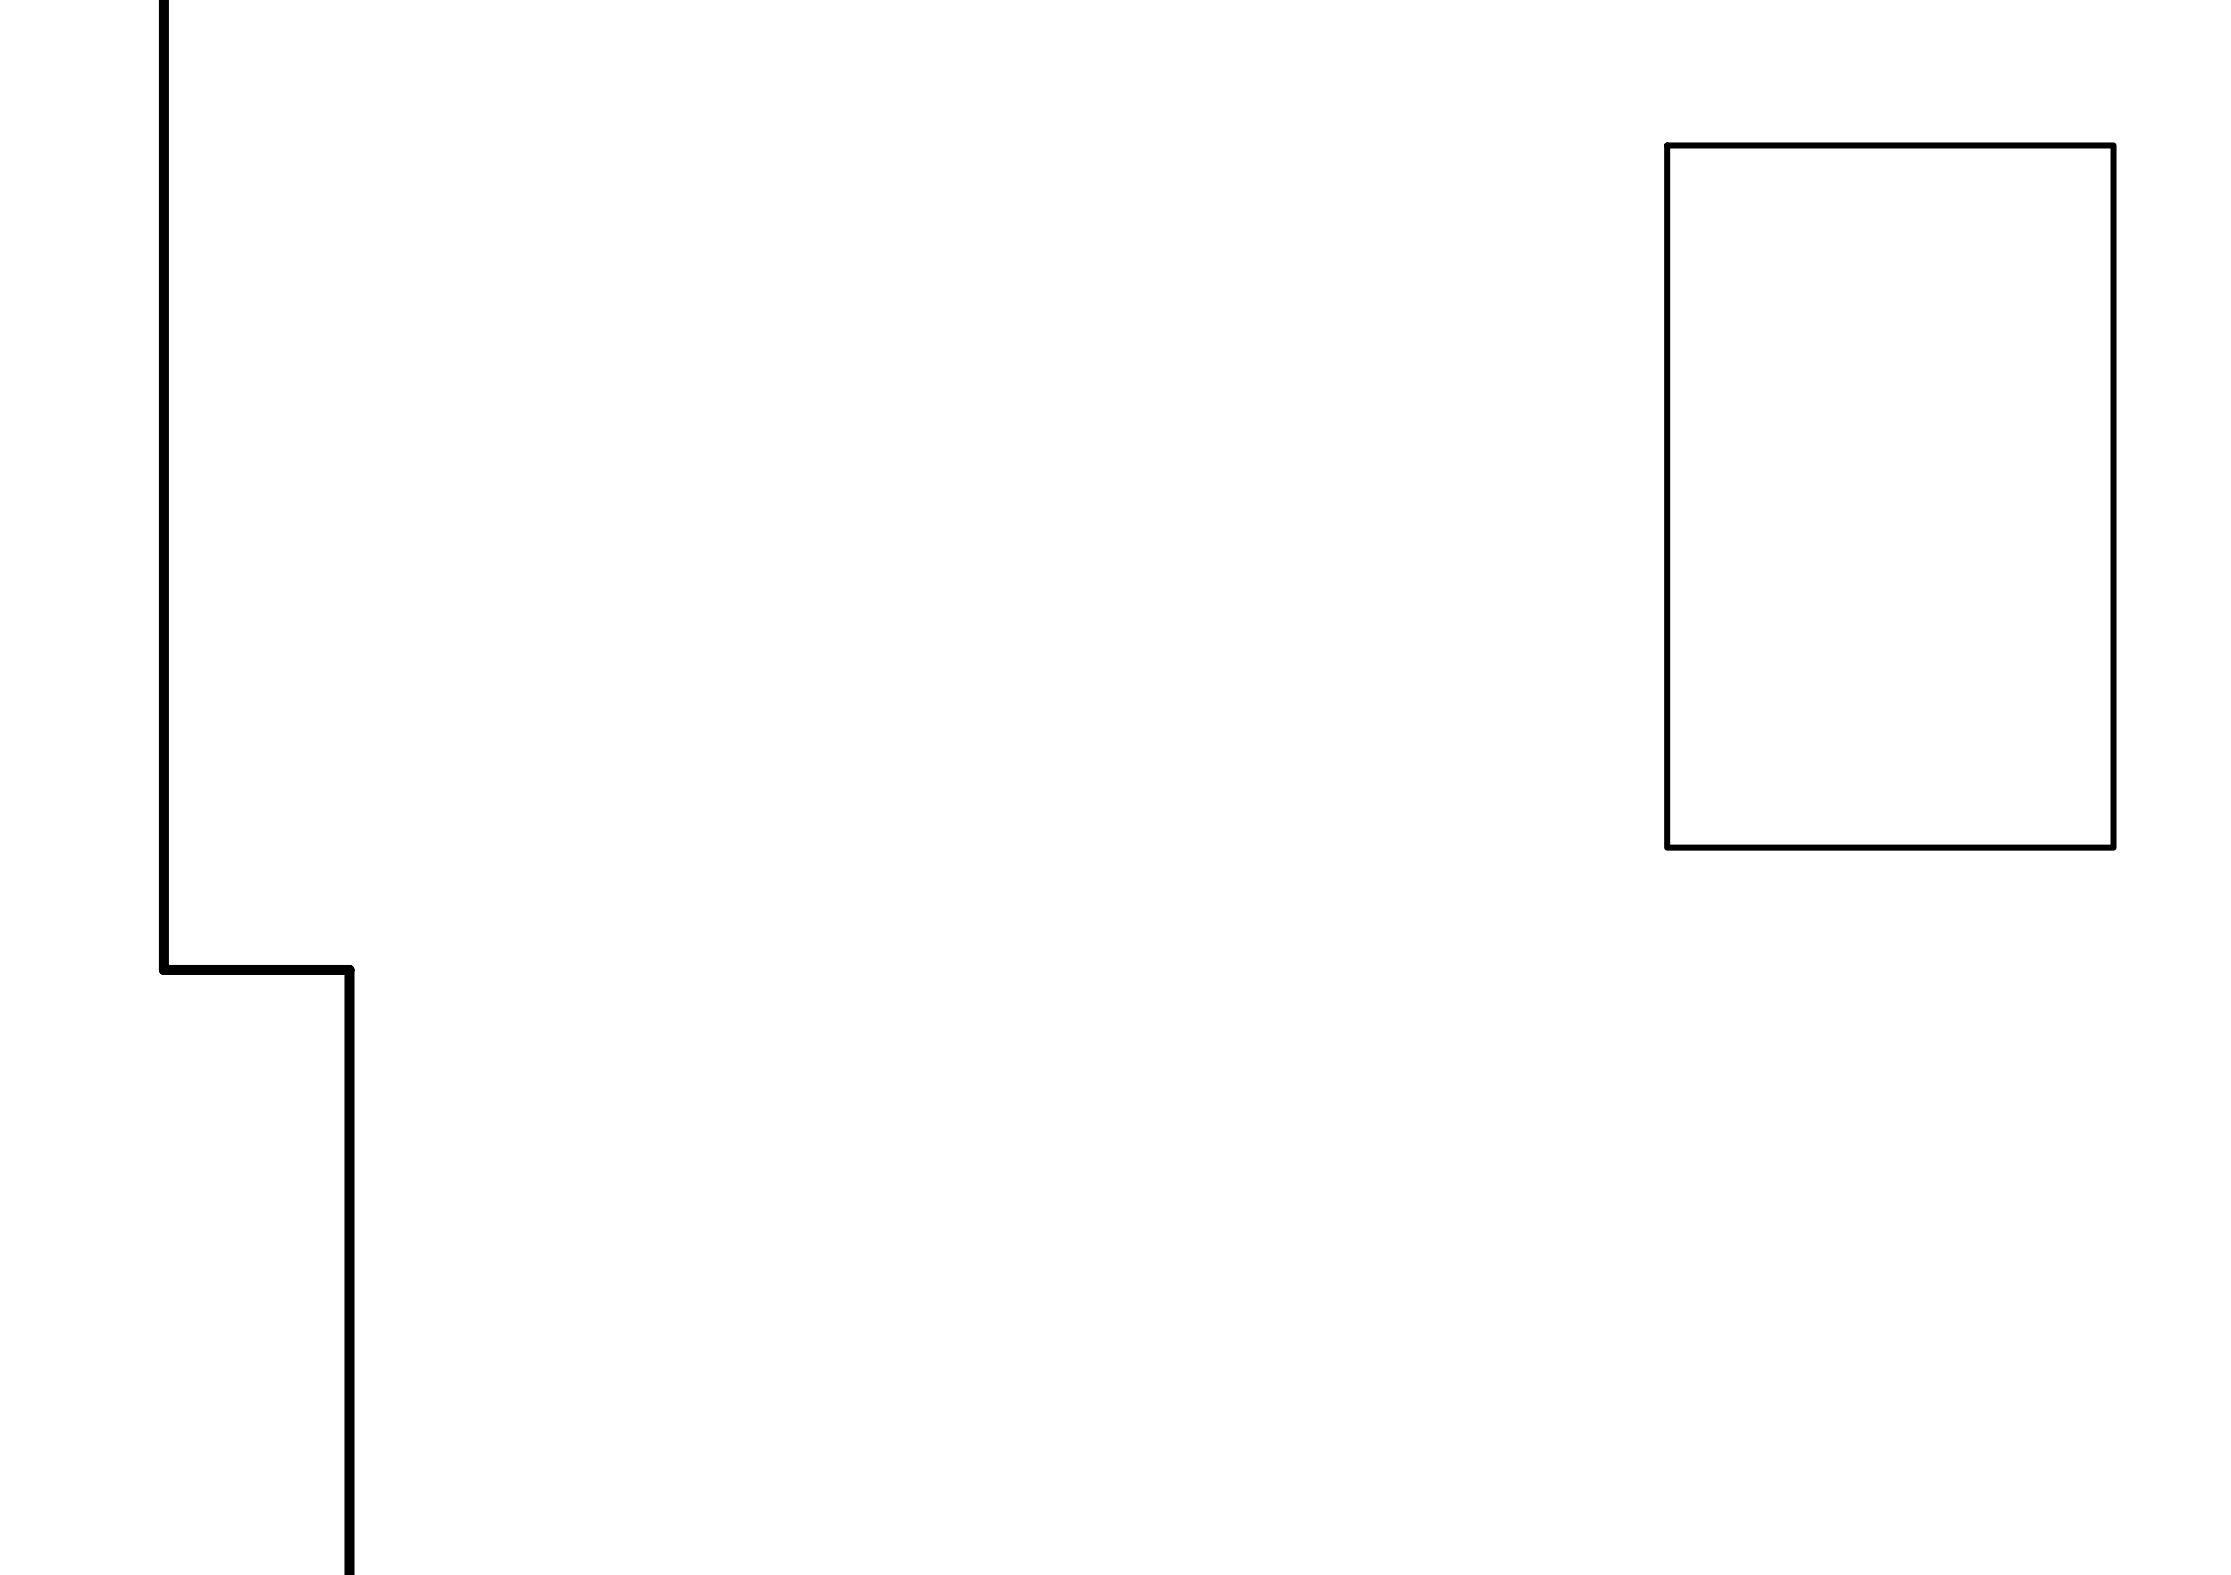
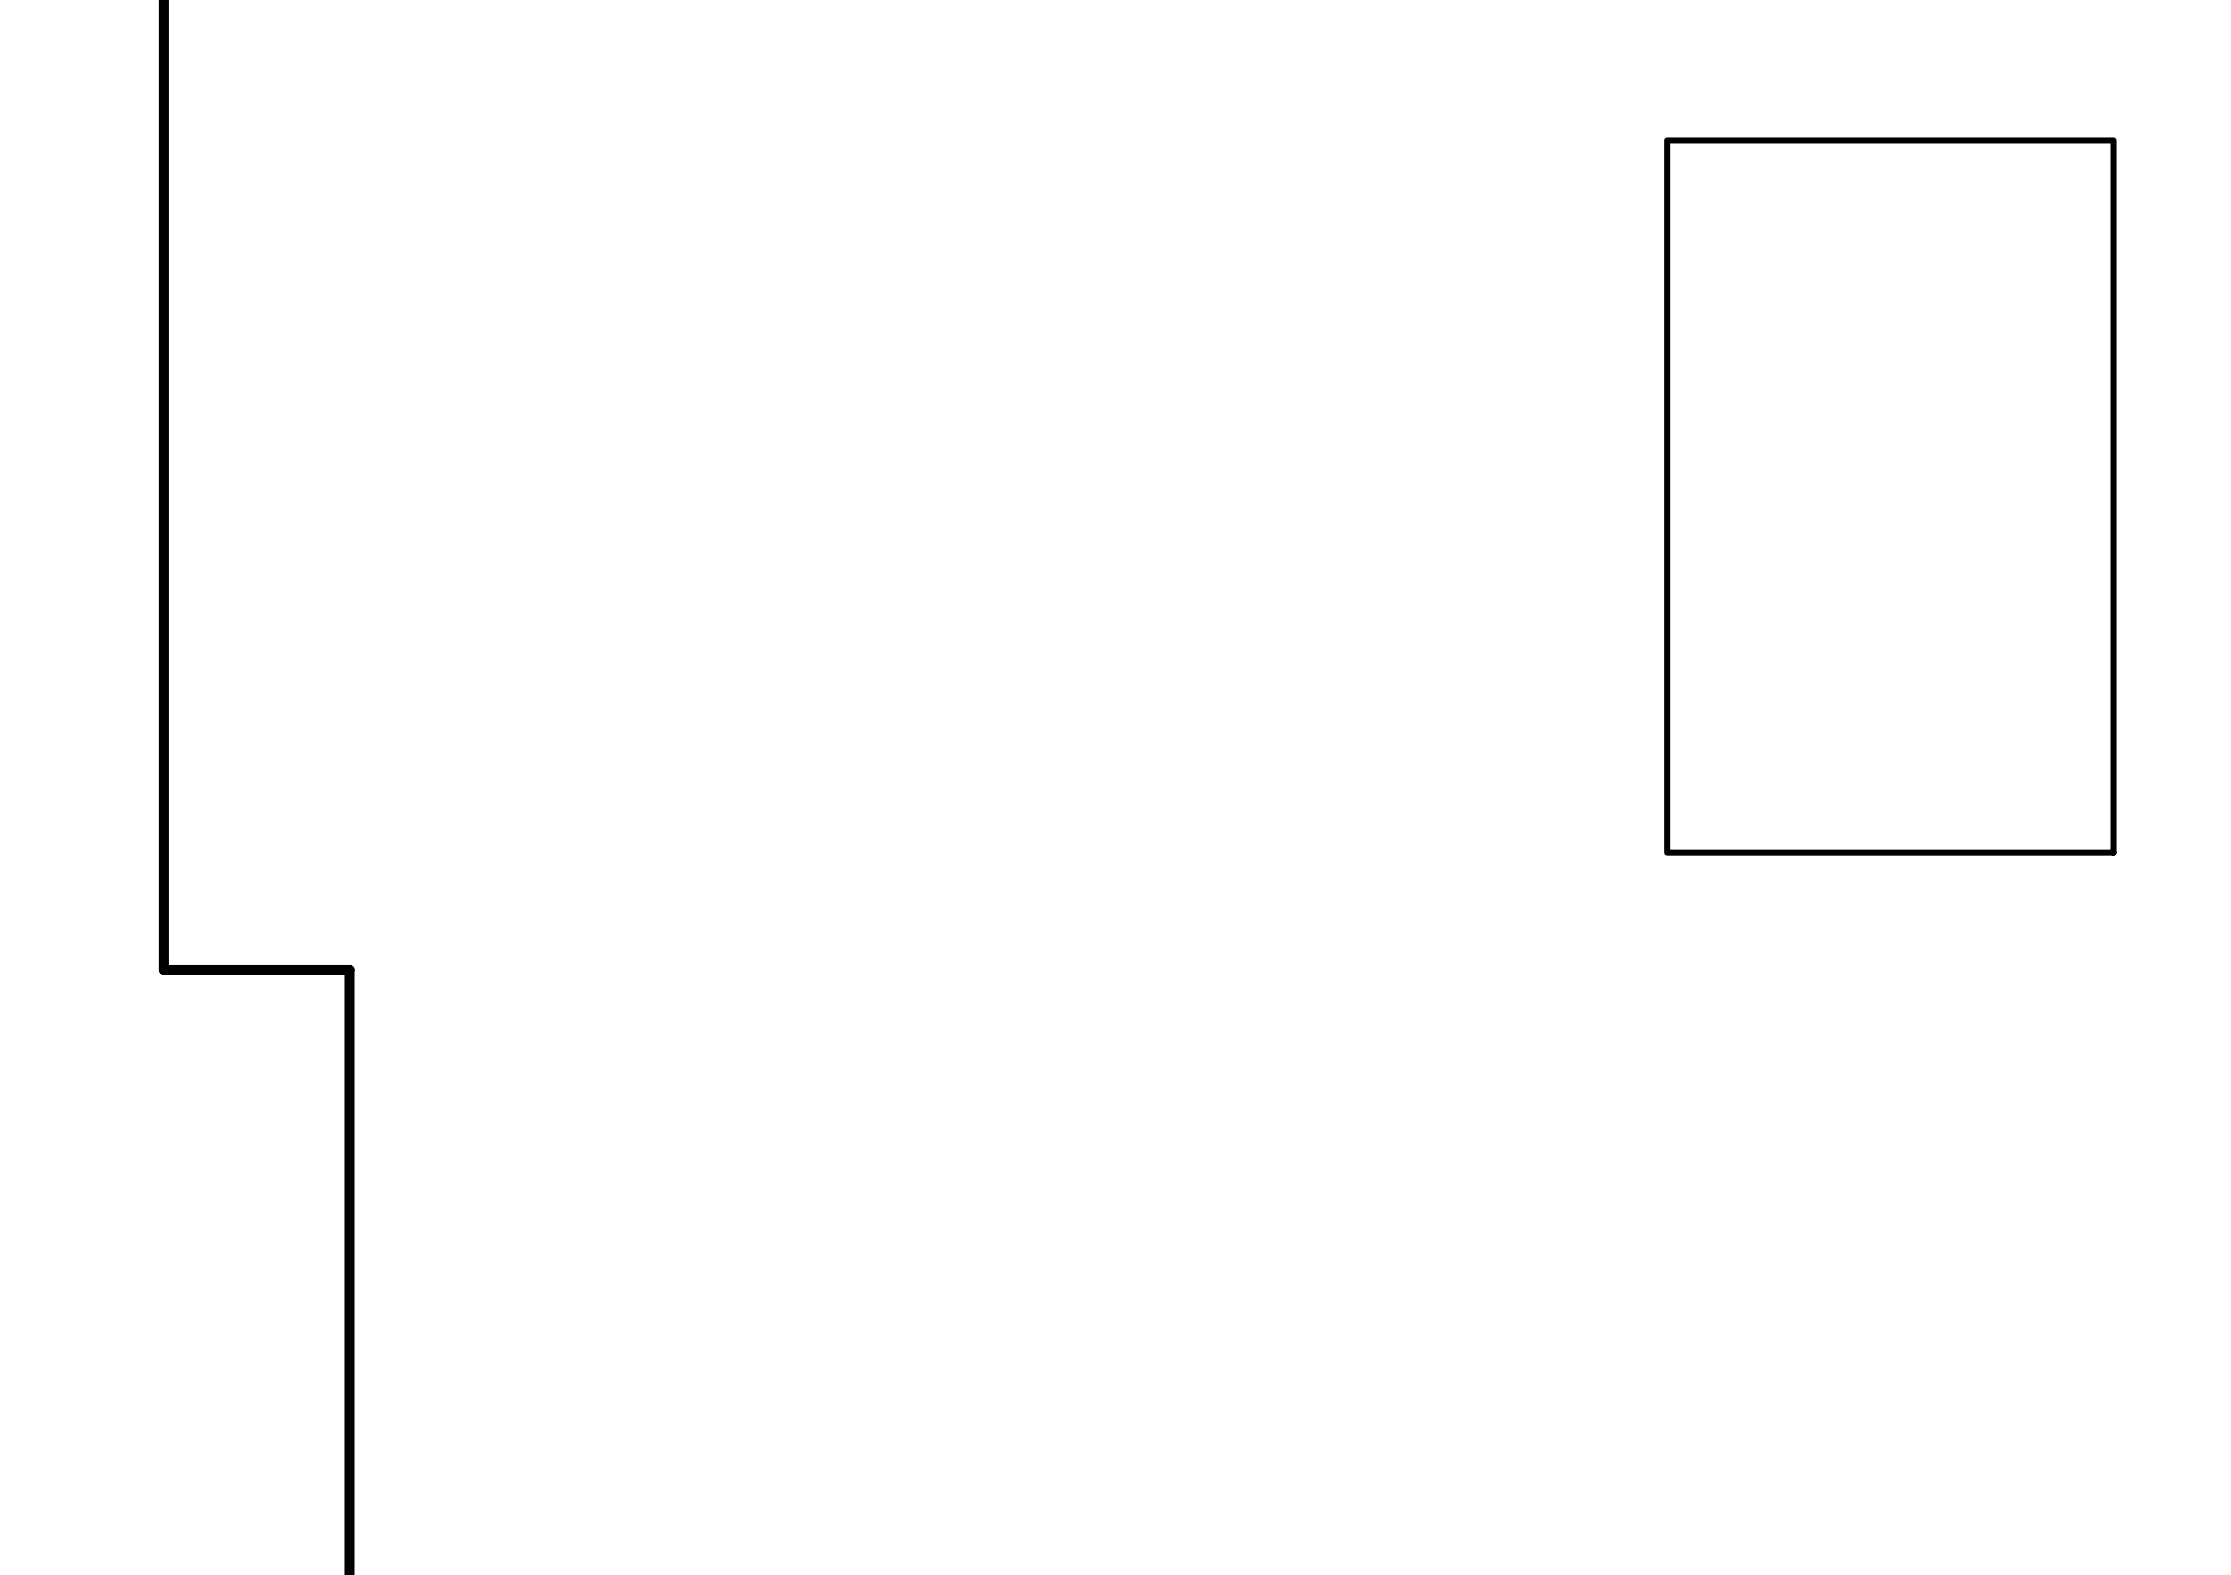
part footprint: [1664, 142, 2117, 851] -> [1664, 137, 2117, 856]

